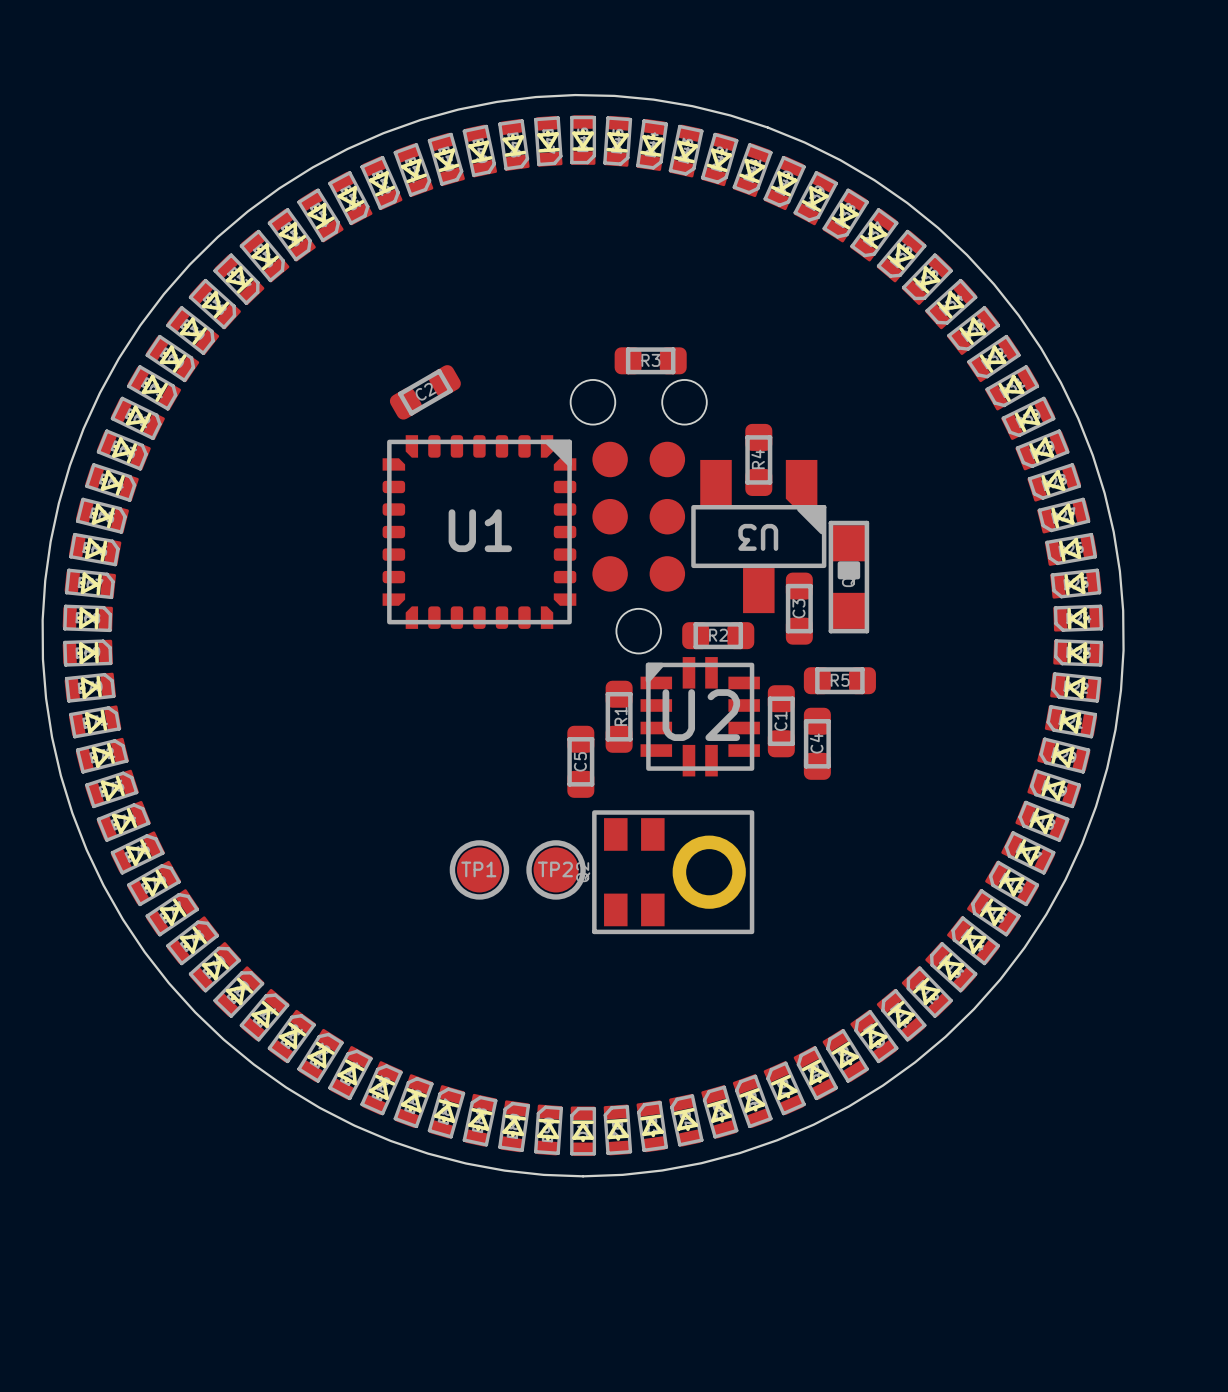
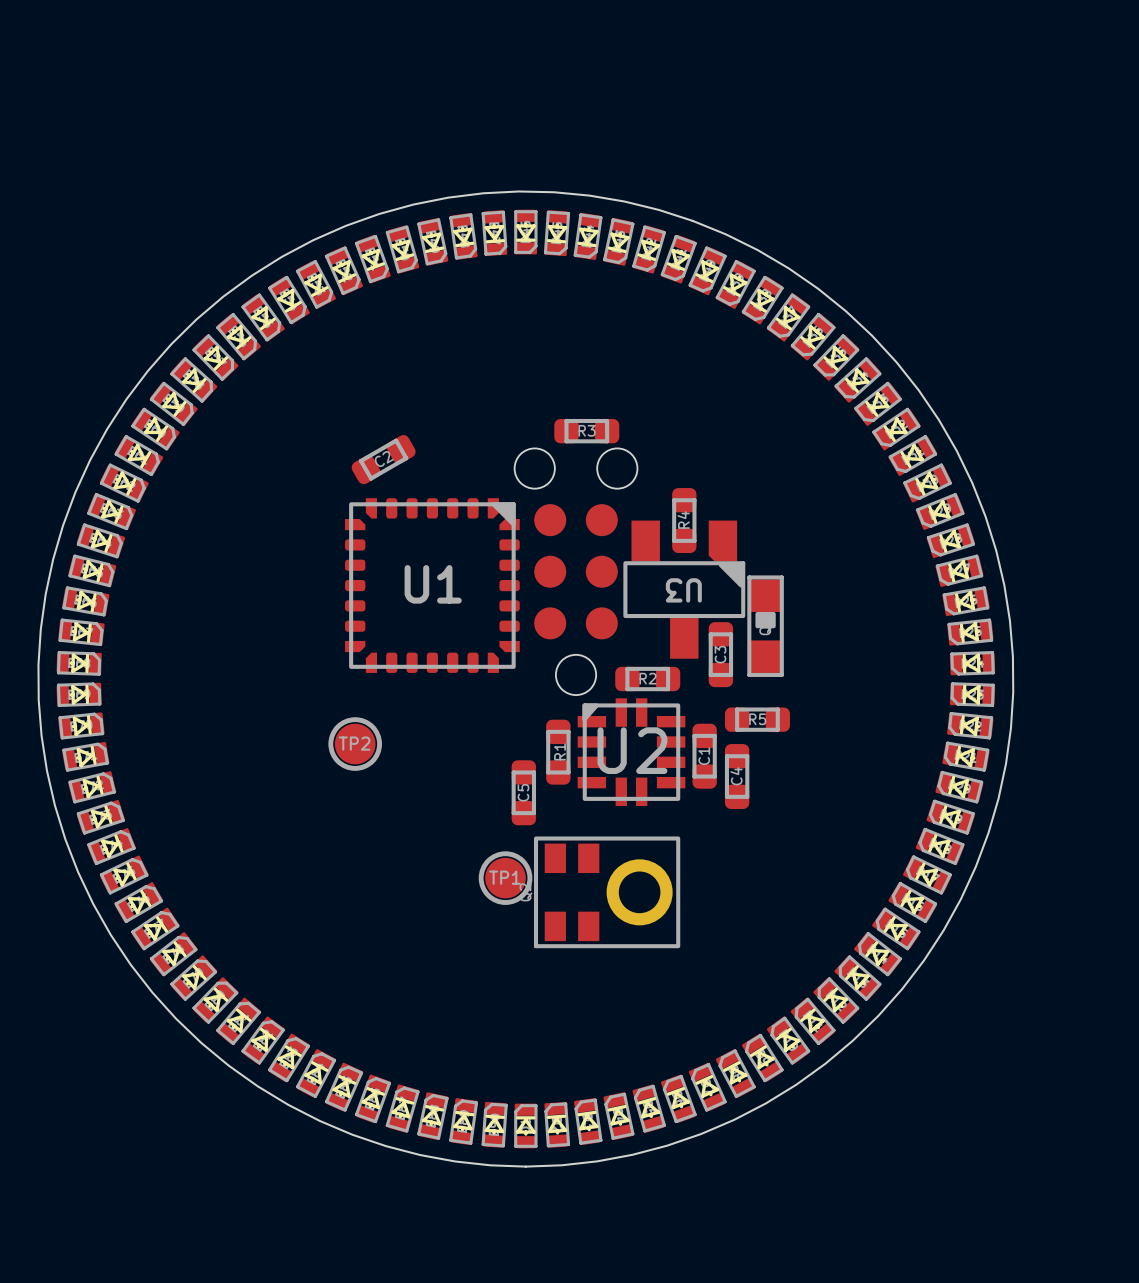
TP1 position: (479, 869) -> (505, 878)
TP2 position: (556, 869) -> (355, 744)

